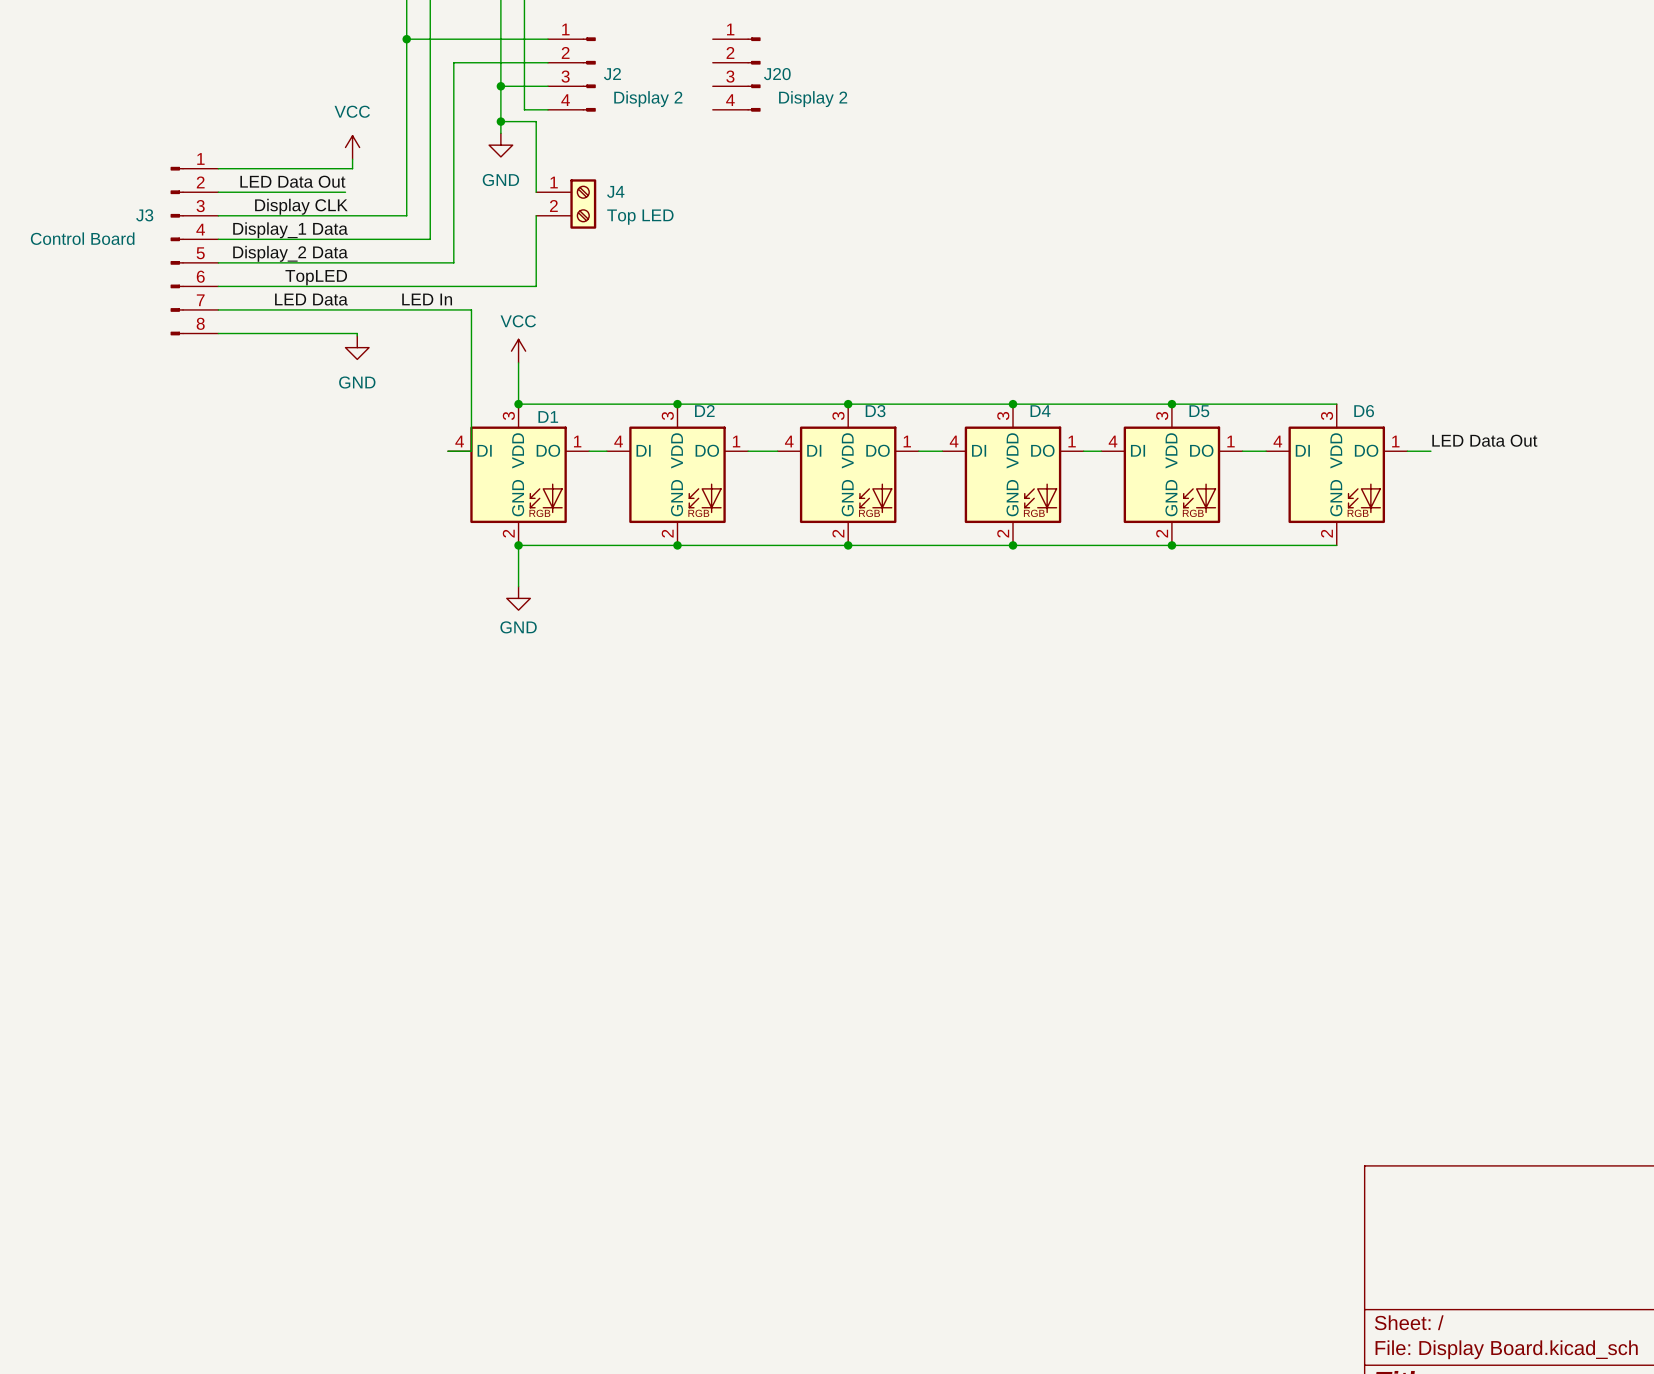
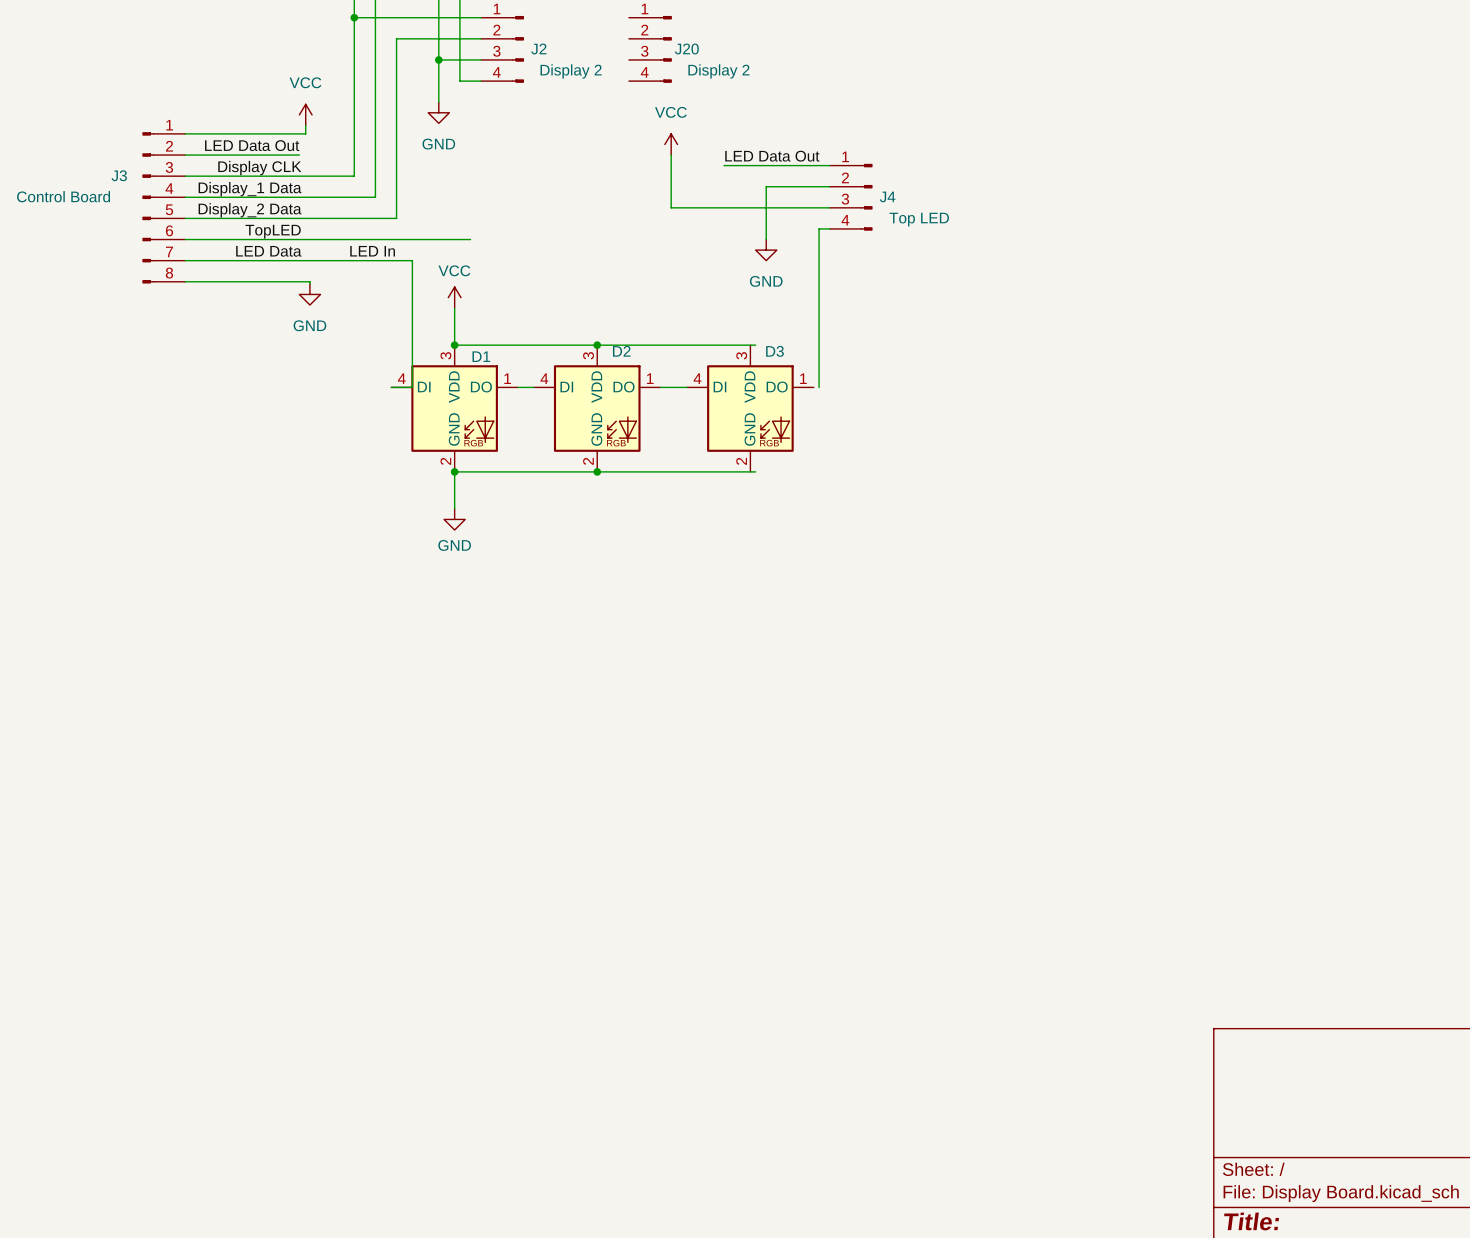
wire: (500, 121) (536, 121) (536, 192) -> none
junction: (500, 121) -> none
J4 symbol: [536, 179, 597, 229] -> [829, 163, 873, 231]
power symbol: none -> VCC (671, 144)
wire: none -> (671, 155) (671, 207) (829, 207)
label: none -> LED Data Out (772, 156)
wire: none -> (723, 165) (829, 165)
wire: (536, 215) (536, 286) -> none
wire: none -> (829, 186) (766, 186) (766, 239)
wire: none -> (829, 228) (819, 228) (819, 387)
power symbol: none -> GND (766, 250)
junction: (848, 404) -> none
wire: (854, 404) (1336, 404) -> none
junction: (1013, 404) -> none
junction: (1171, 404) -> none
label: LED Data Out (1484, 440) -> none
wire: (918, 451) (942, 451) -> none
wire: (1083, 451) (1101, 451) -> none
wire: (1242, 451) (1266, 451) -> none
wire: (1407, 451) (1430, 451) -> none
D4: (1013, 474) -> none
D5: (1171, 474) -> none
D6: (1336, 474) -> none
junction: (848, 545) -> none
wire: (854, 545) (1336, 545) -> none
junction: (1013, 545) -> none
junction: (1171, 545) -> none

